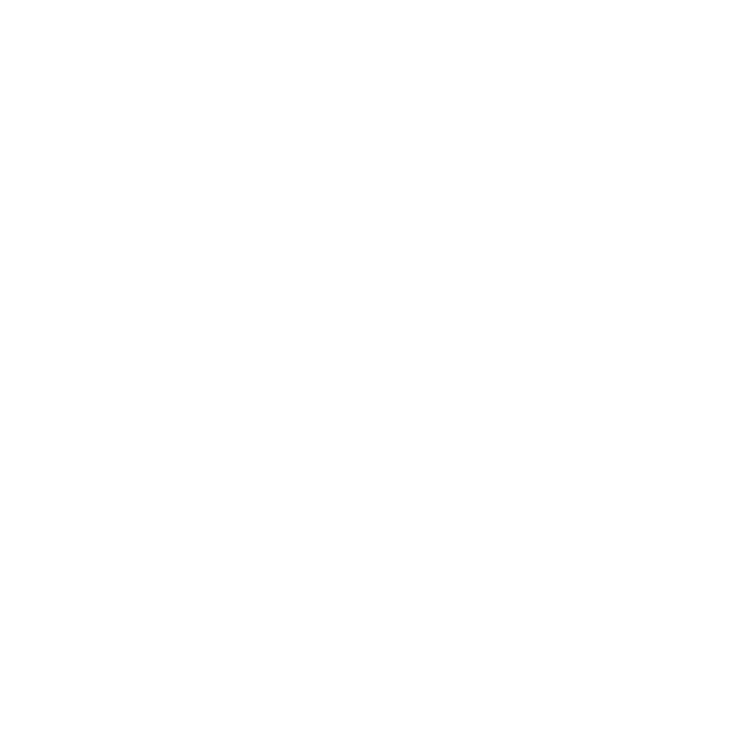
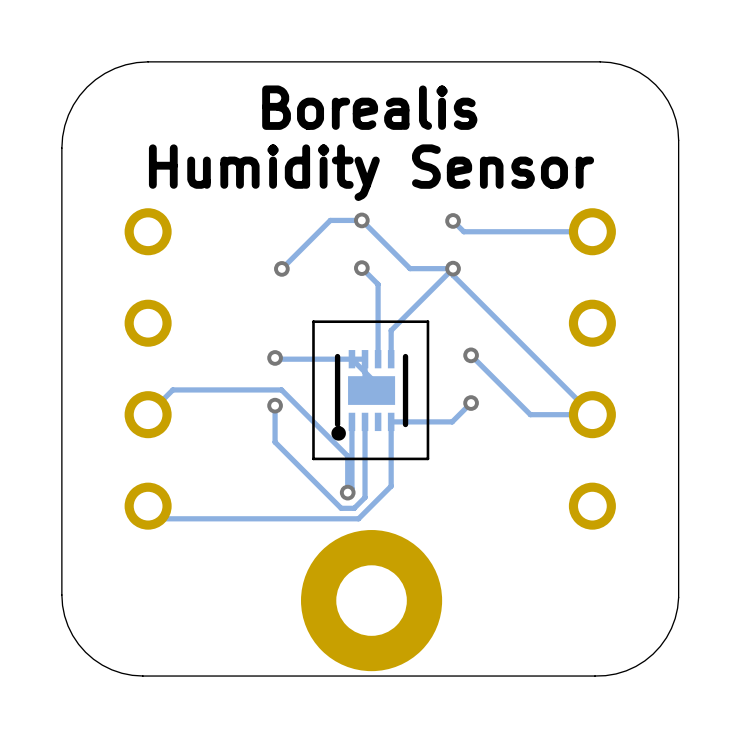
board edge: none -> (600, 61) (148, 61) (115, 68) (95, 79) (79, 95) (64, 125) (61, 148) (61, 595) (64, 615) (72, 635) (93, 659) (121, 673) (142, 676) (595, 676) (616, 673) (635, 666) (660, 646) (671, 628) (678, 597) (677, 130) (668, 101) (647, 78) (620, 64) (600, 61)
text: none -> Borealis (369, 107)
text: none -> Humidity Sensor (371, 172)
via: none -> (361, 220)
track: none -> (453, 220) (463, 231) (592, 231)
via: none -> (453, 220)
via: none -> (281, 268)
track: none -> (361, 268) (378, 284) (378, 359)
via: none -> (361, 268)
track: none -> (453, 268) (453, 275) (592, 414) (530, 414) (471, 355)
track: none -> (453, 268) (391, 330) (391, 359)
track: none -> (453, 268) (410, 268) (361, 220) (330, 220) (281, 268)
via: none -> (453, 268)
line: none -> (427, 321) (313, 321) (313, 458) (427, 458) (427, 321)
track: none -> (351, 354) (351, 359) (371, 378) (371, 390) (365, 384) (365, 359) (276, 359) (275, 357)
via: none -> (471, 355)
via: none -> (275, 357)
part: none -> (148, 368)
part: none -> (592, 368)
part: none -> (369, 395)
track: none -> (471, 403) (452, 421) (391, 421) (391, 486) (358, 518) (160, 518) (148, 506)
via: none -> (471, 403)
track: none -> (275, 405) (275, 442) (341, 508) (354, 508) (365, 497) (365, 421)
via: none -> (275, 405)
track: none -> (148, 414) (172, 389) (281, 389) (347, 456) (347, 492) (351, 488) (351, 421)
via: none -> (347, 492)
part: none -> (371, 600)

